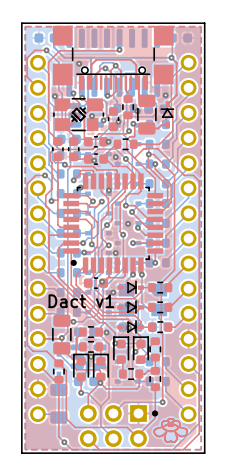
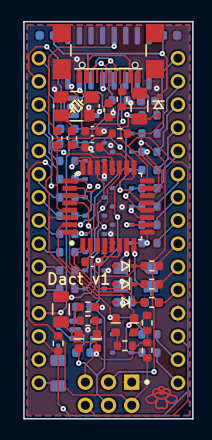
part footprint: [113, 336, 130, 364] -> [110, 314, 121, 337]
part footprint: [133, 336, 149, 364] -> [128, 314, 140, 337]
part footprint: [73, 353, 90, 382] -> [73, 329, 84, 353]
part footprint: [93, 353, 109, 382] -> [91, 329, 103, 353]

